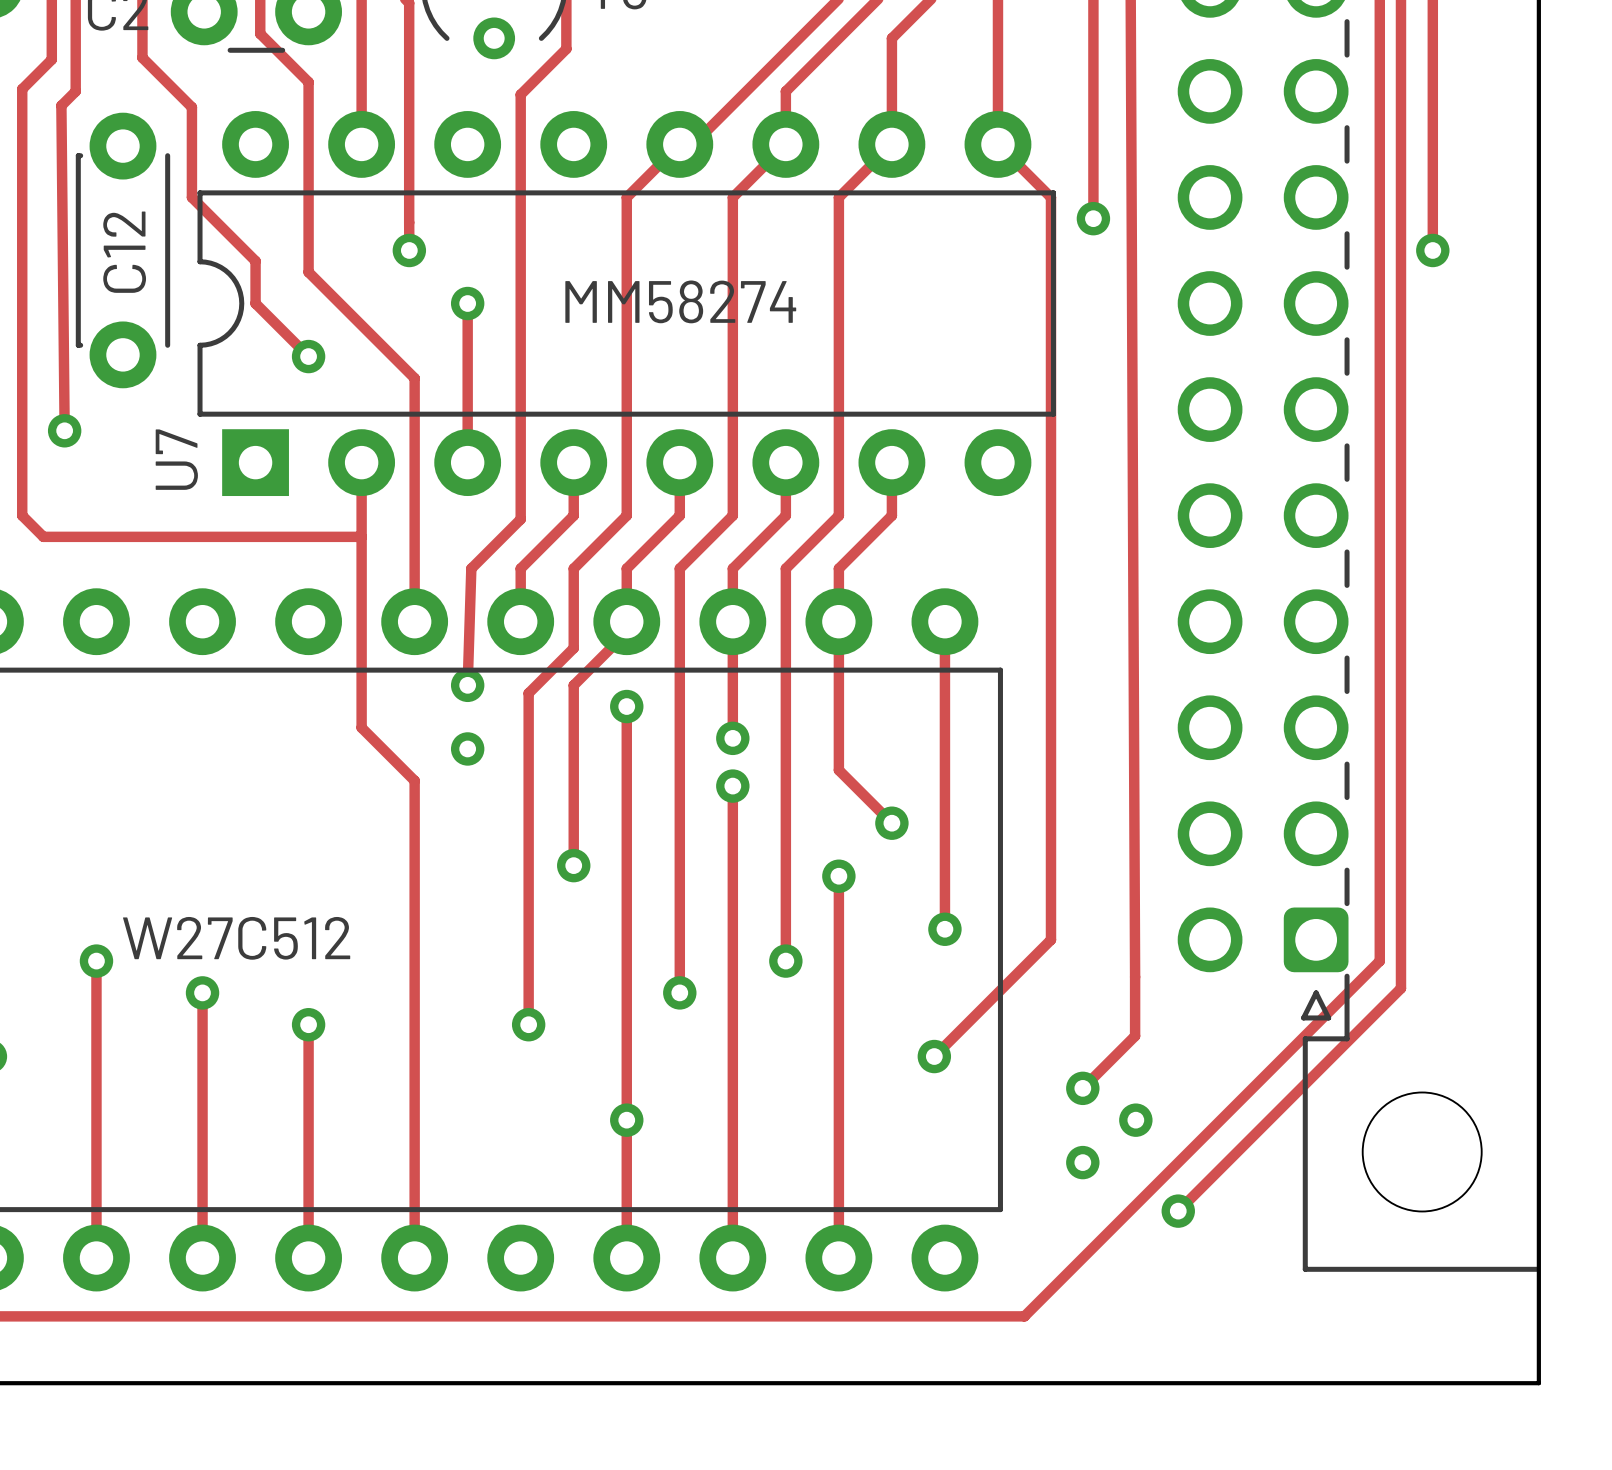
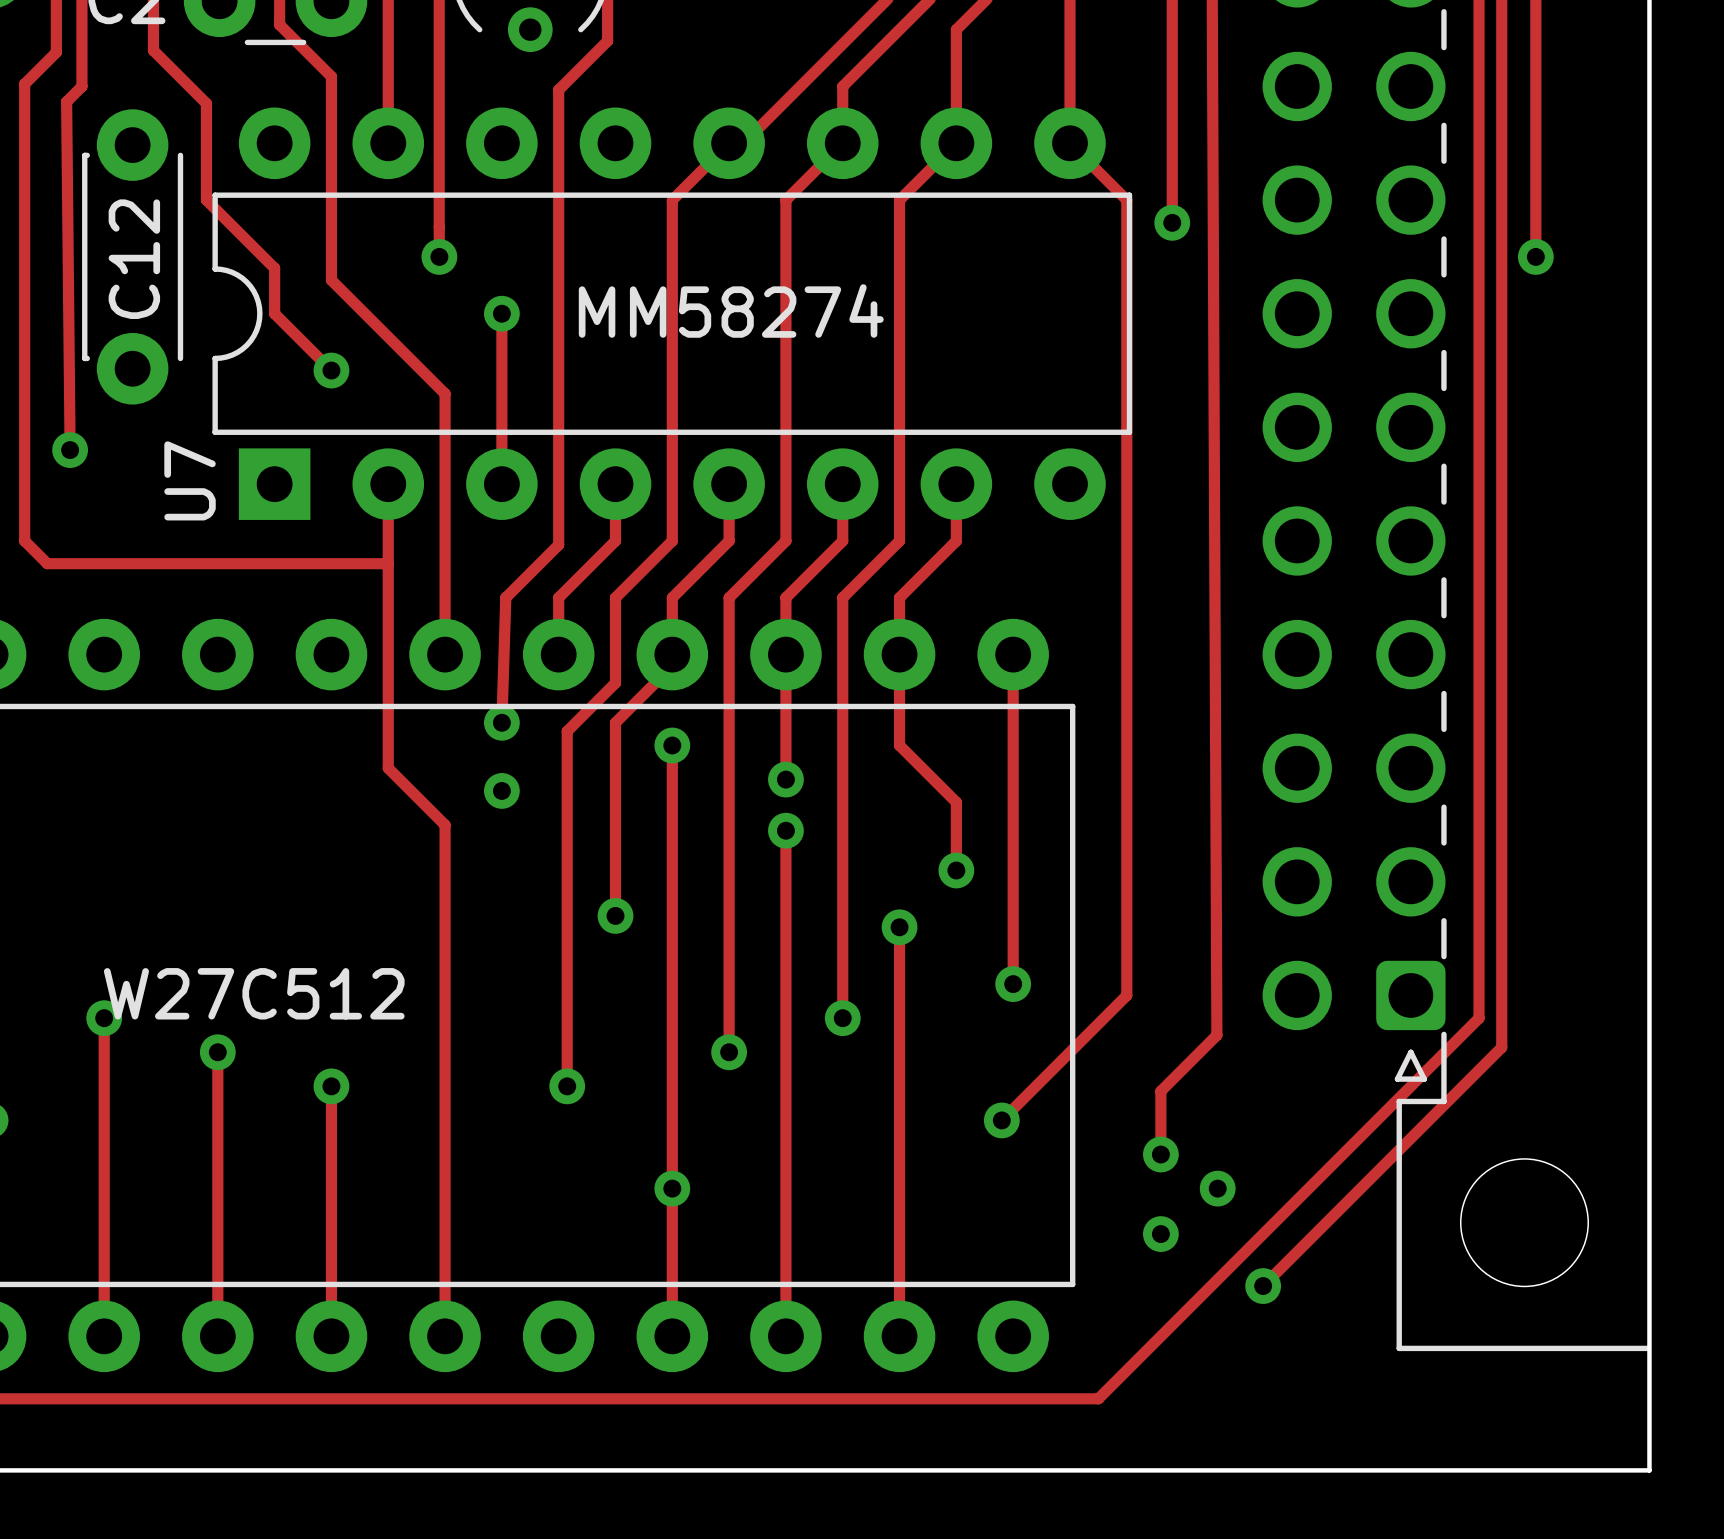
track: (838, 706) (838, 770) (891, 823) -> (899, 745) (956, 802) (956, 870)
track: (1135, 976) (1135, 1036) (1082, 1088) -> (1216, 1035) (1160, 1091) (1160, 1154)

